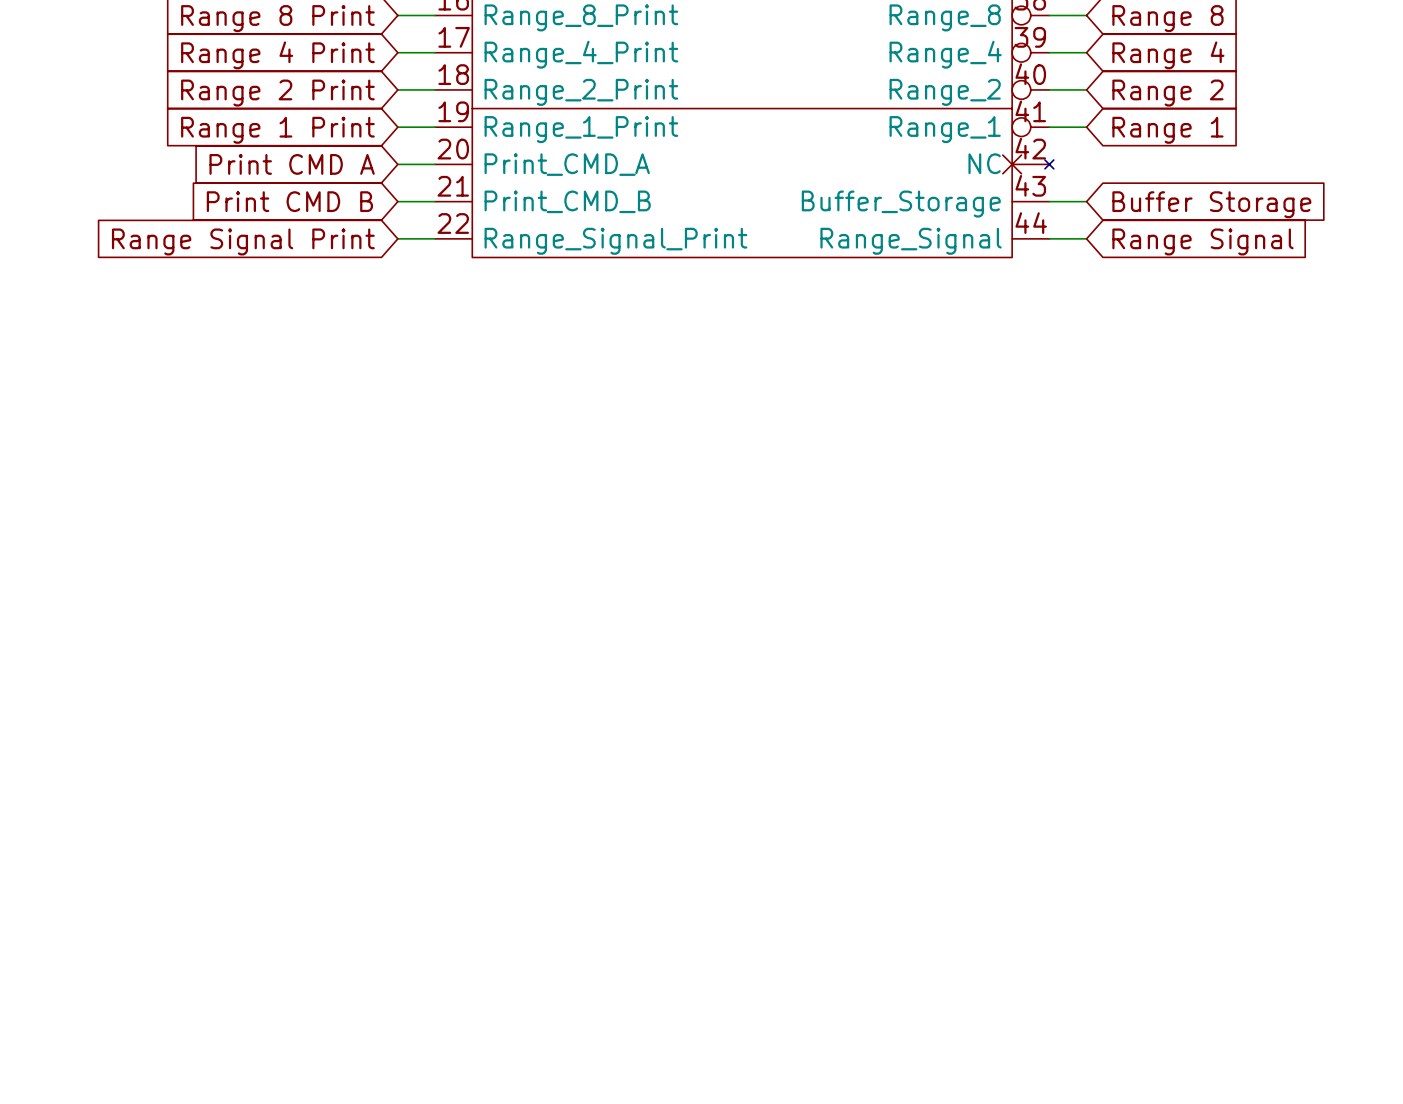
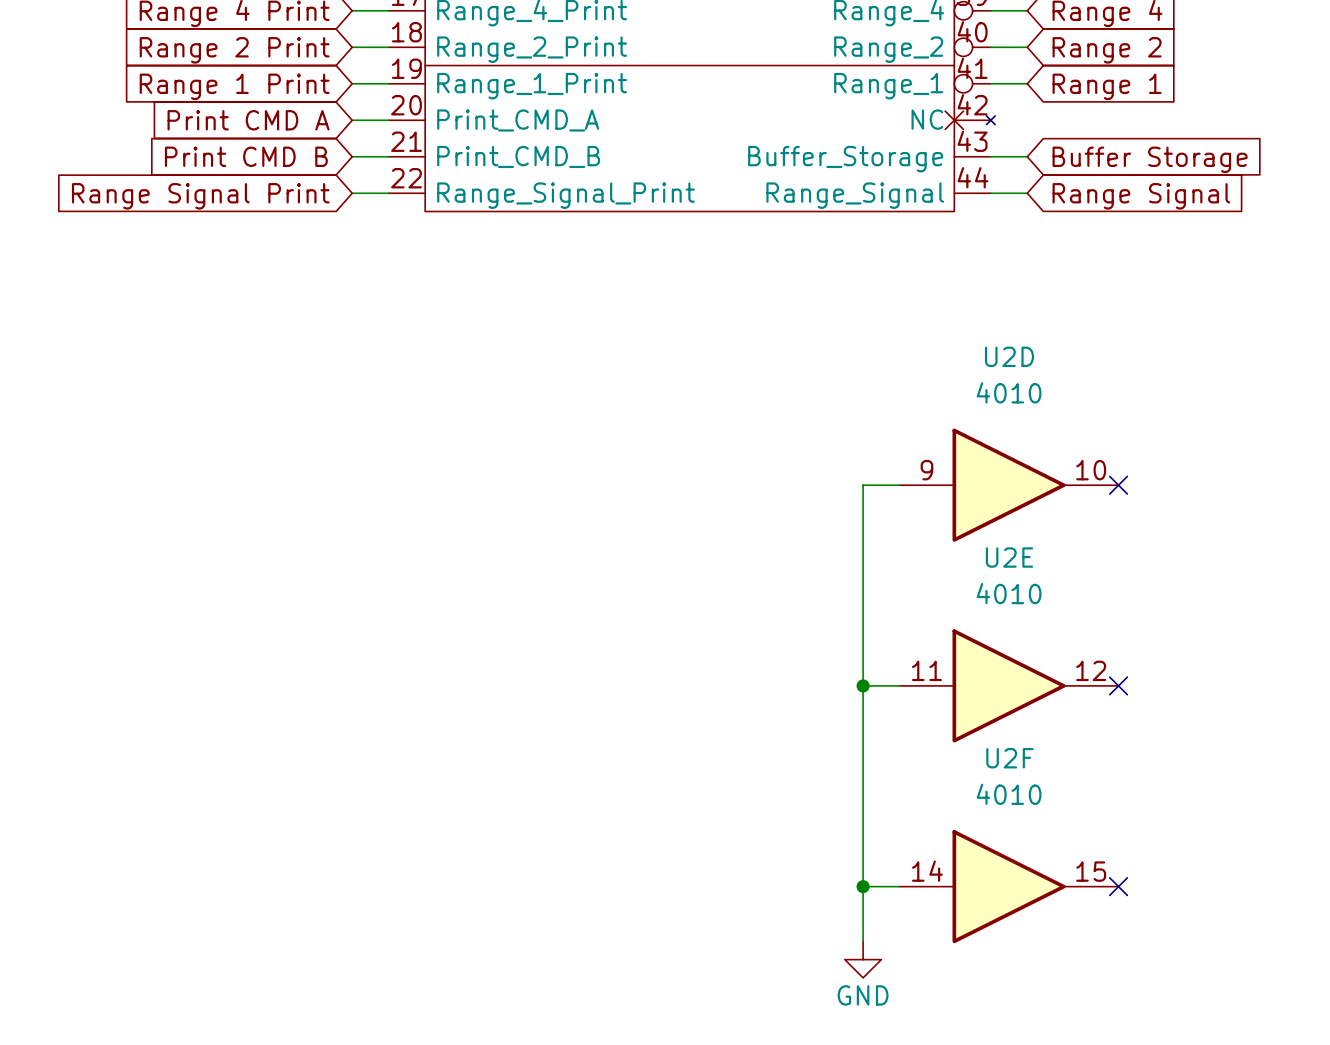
wire: none -> (899, 485) (863, 485) (863, 941)
U2D: none -> 4010 (1009, 485)
no-connect mark: none -> (1118, 485)
wire: none -> (863, 685) (899, 685)
junction: none -> (863, 685)
U2E: none -> 4010 (1009, 685)
no-connect mark: none -> (1118, 685)
wire: none -> (863, 886) (899, 886)
junction: none -> (863, 886)
U2F: none -> 4010 (1009, 886)
no-connect mark: none -> (1118, 886)
power symbol: none -> GND (863, 959)

